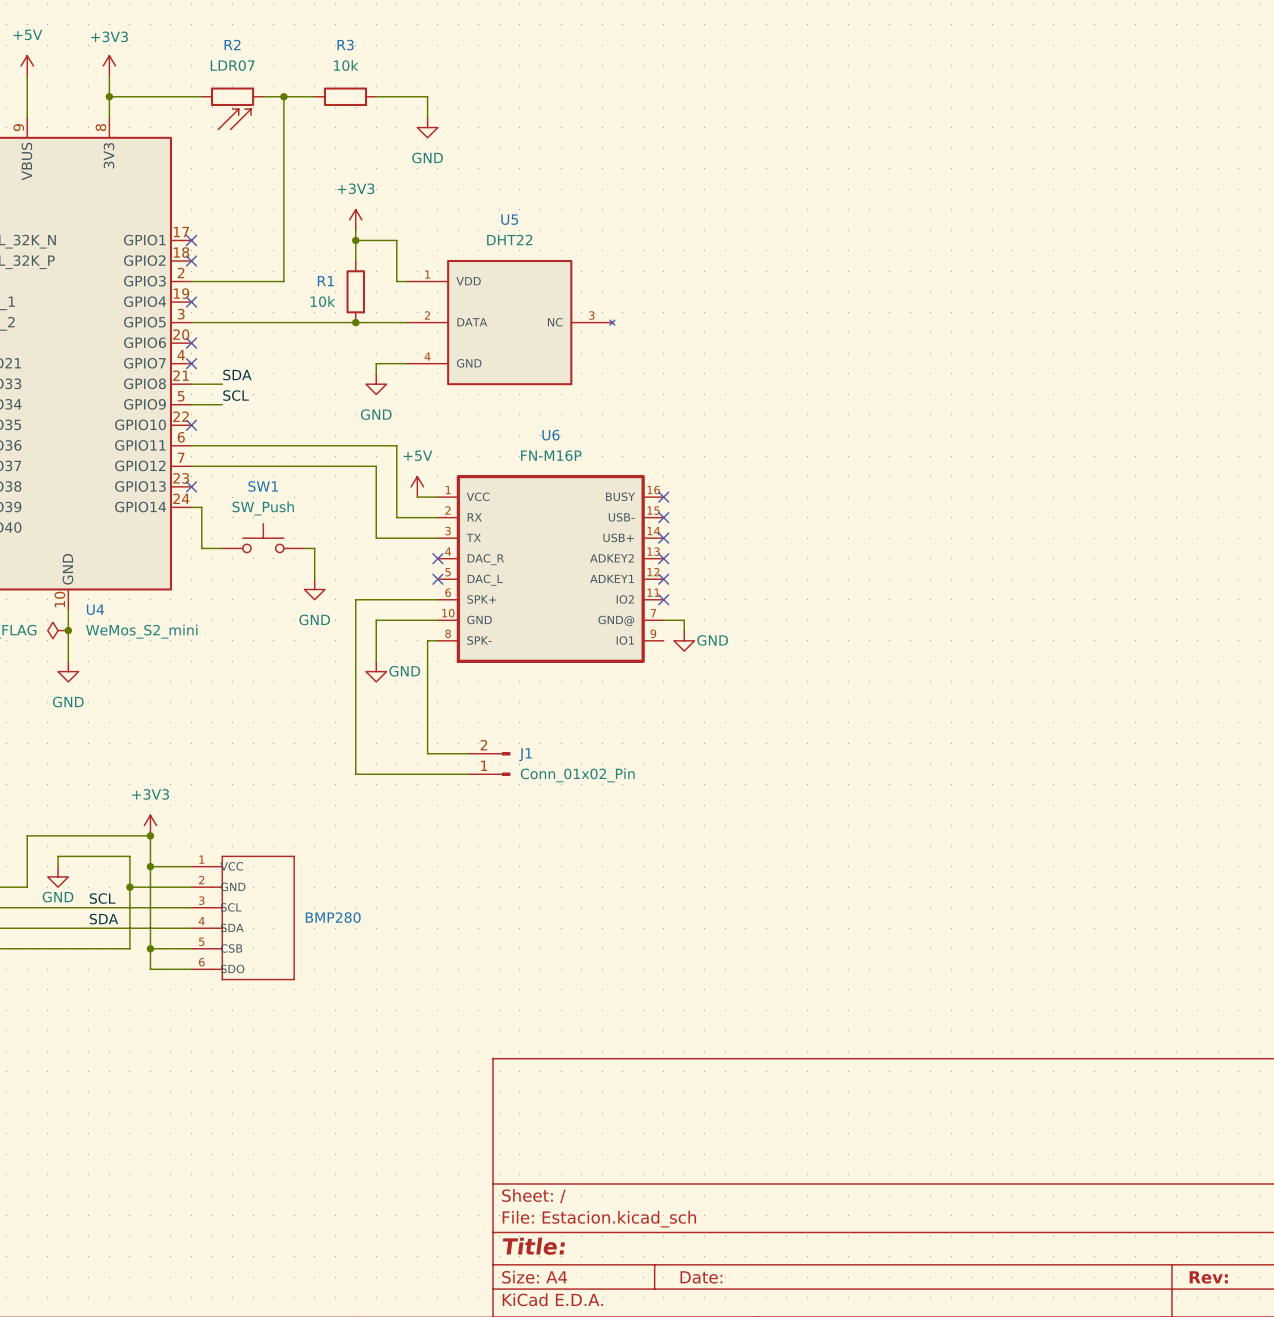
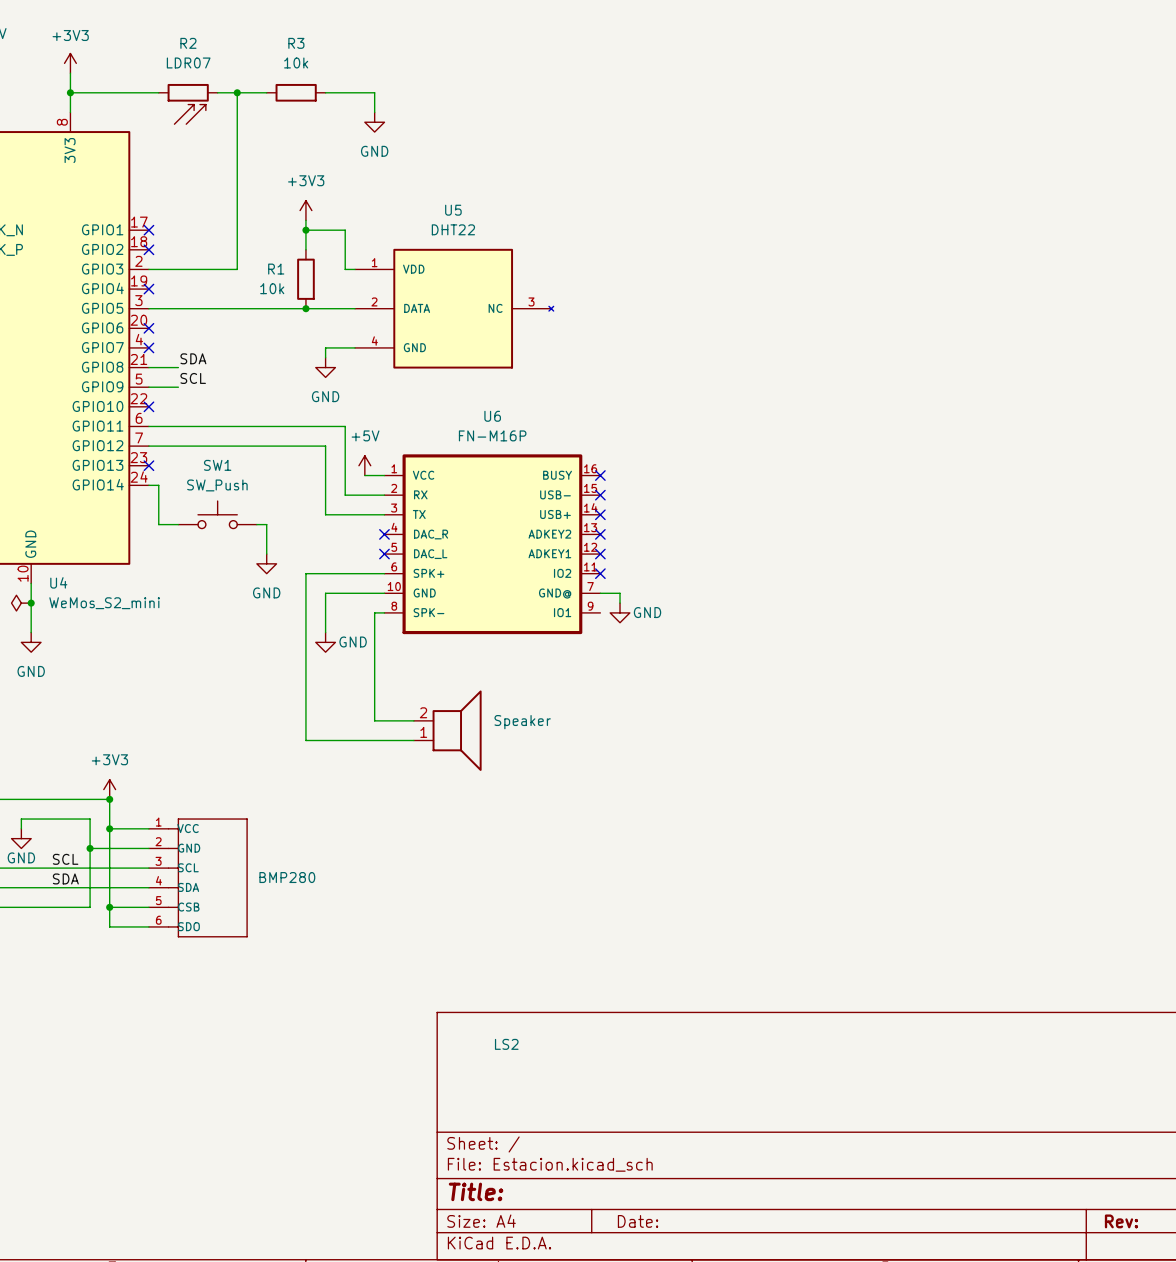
J1: Conn_01x02_Pin (489, 764) -> none
LS2: none -> Speaker (447, 730)

